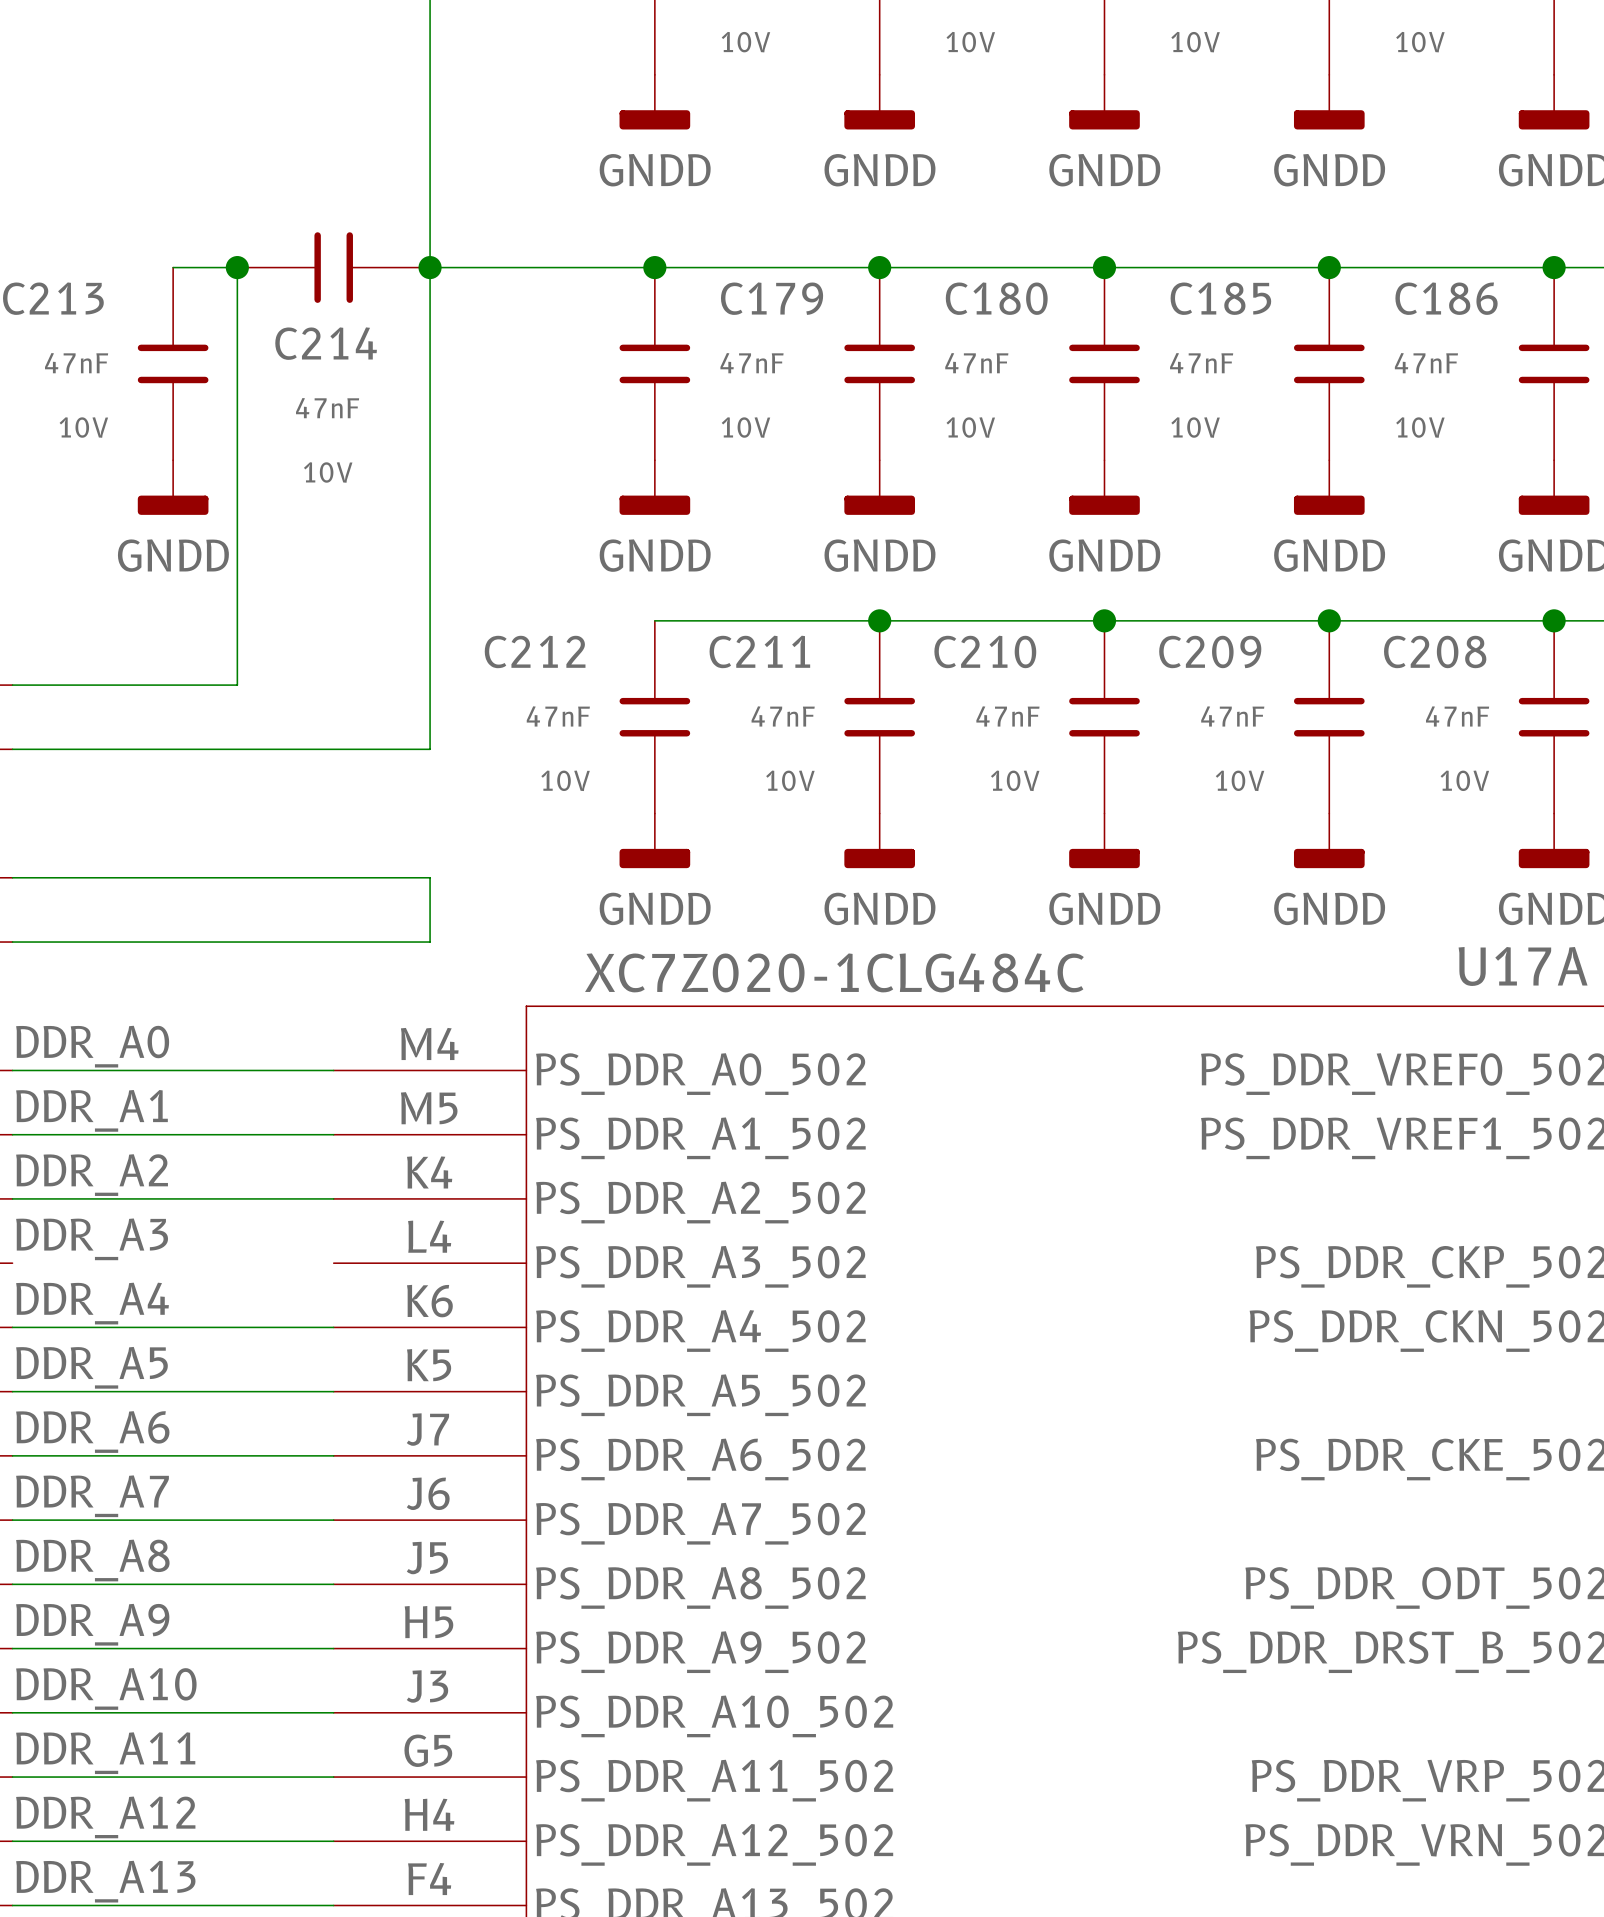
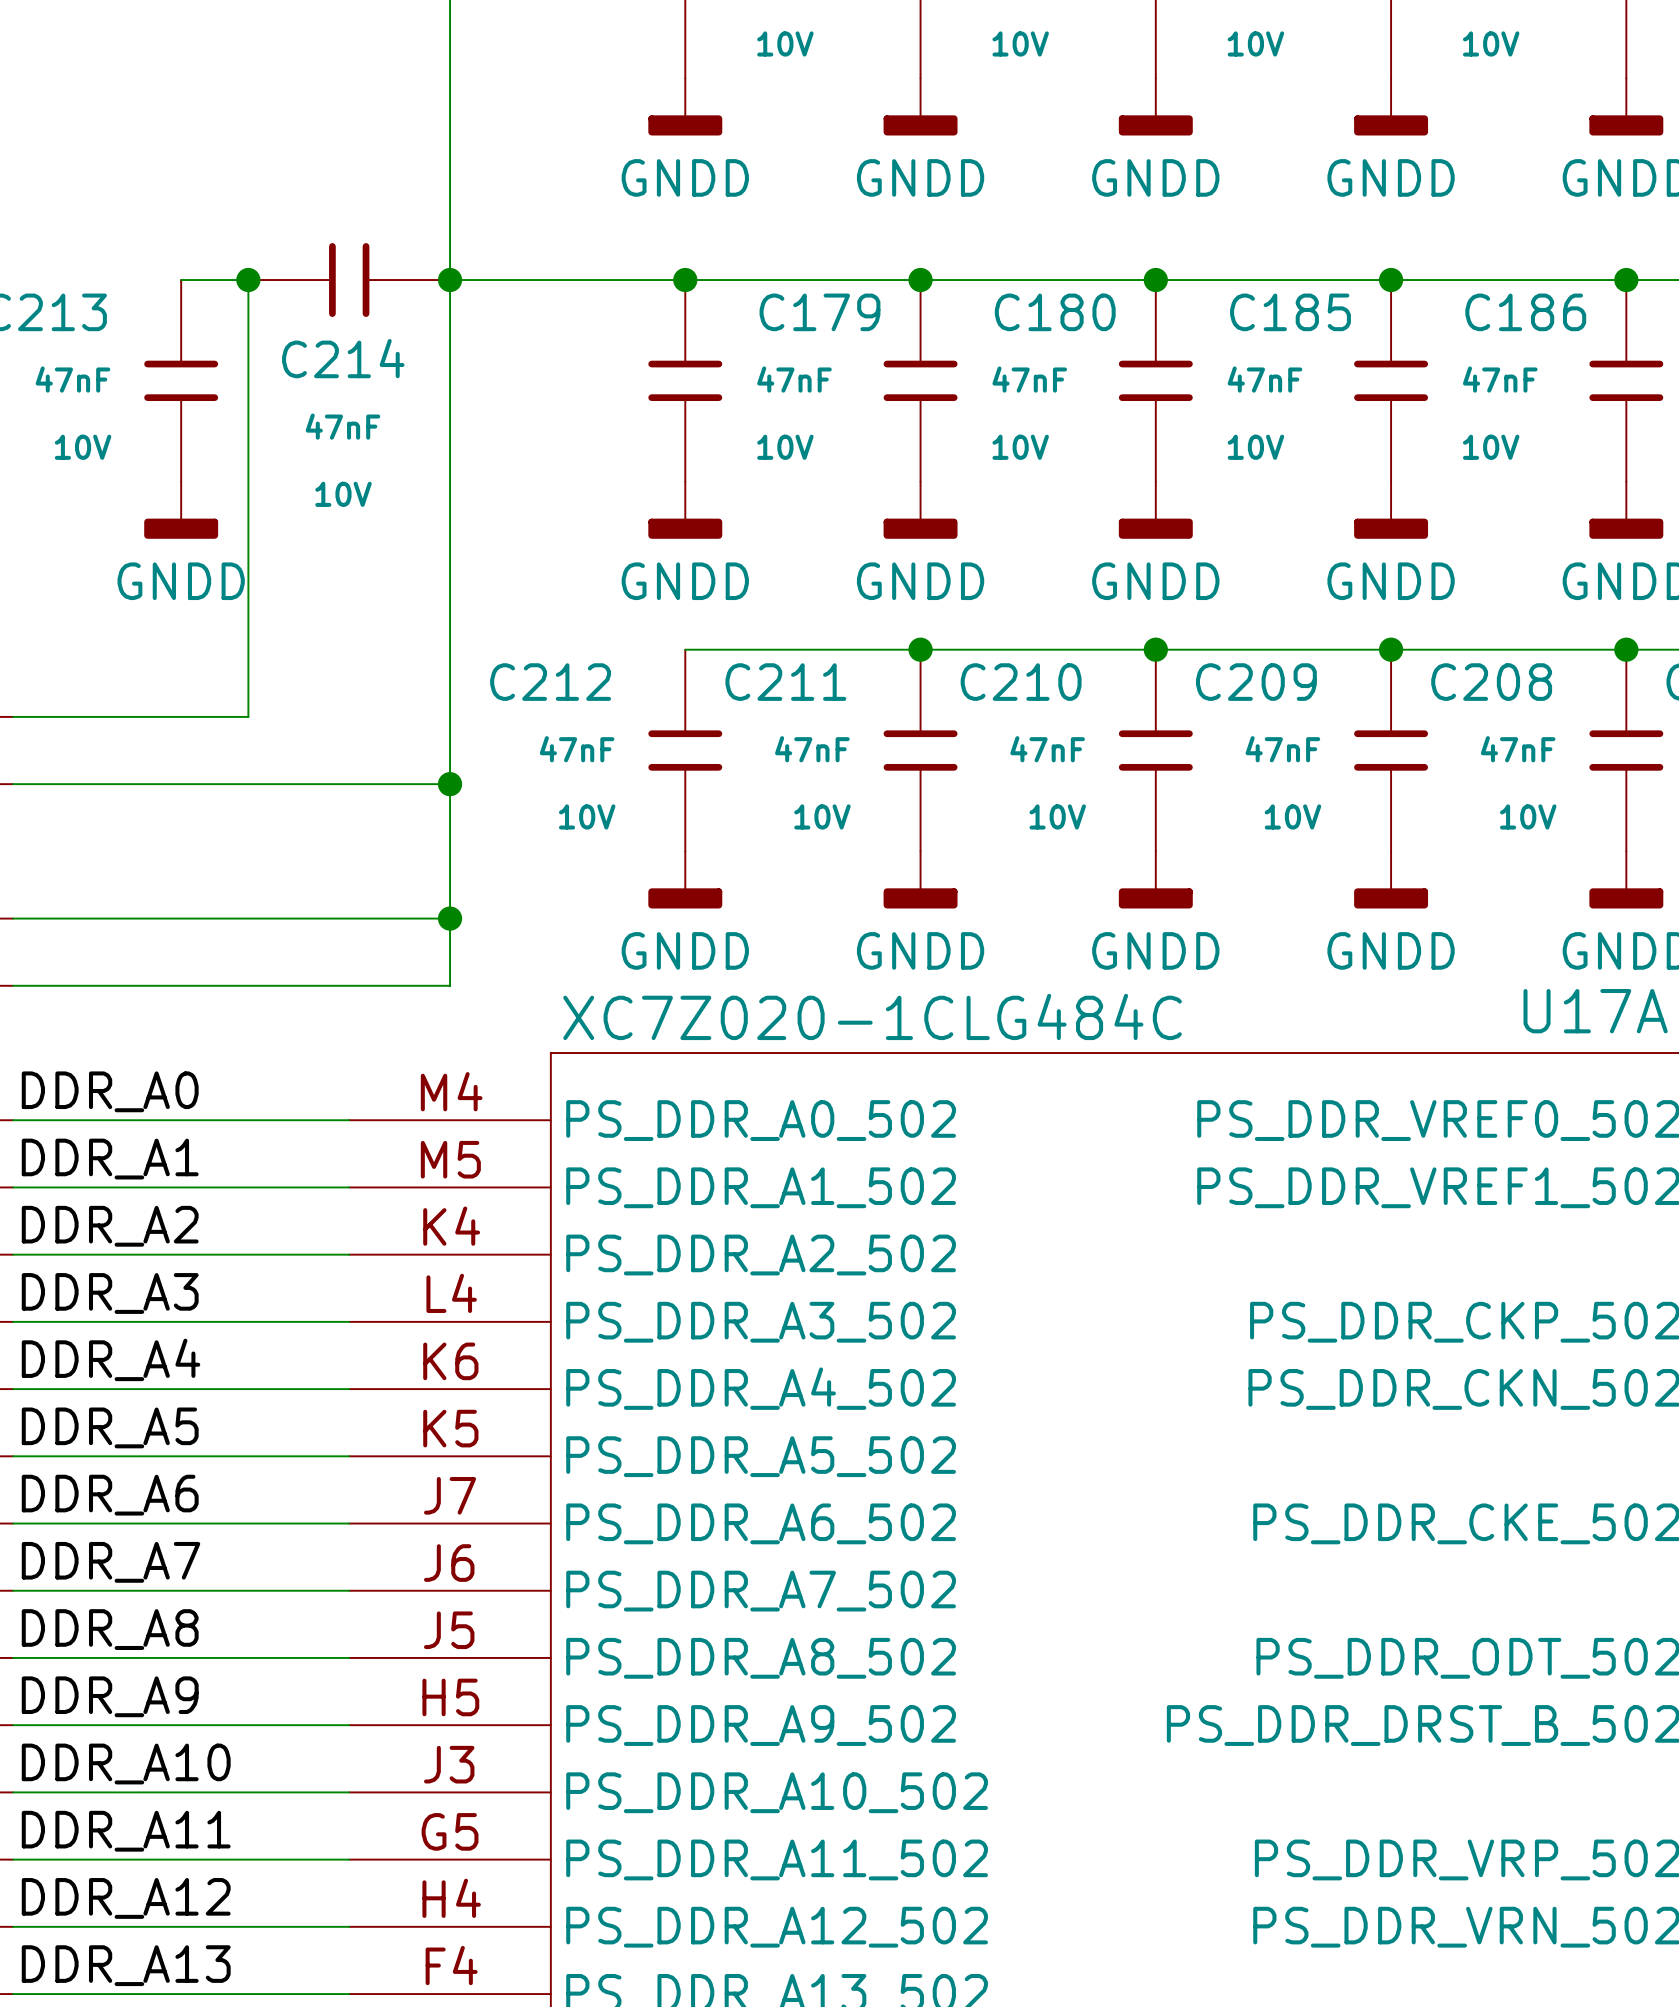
wire: none -> (450, 784) (450, 918)
junction: none -> (450, 784)
junction: none -> (450, 918)
wire: none -> (13, 1321) (349, 1321)

